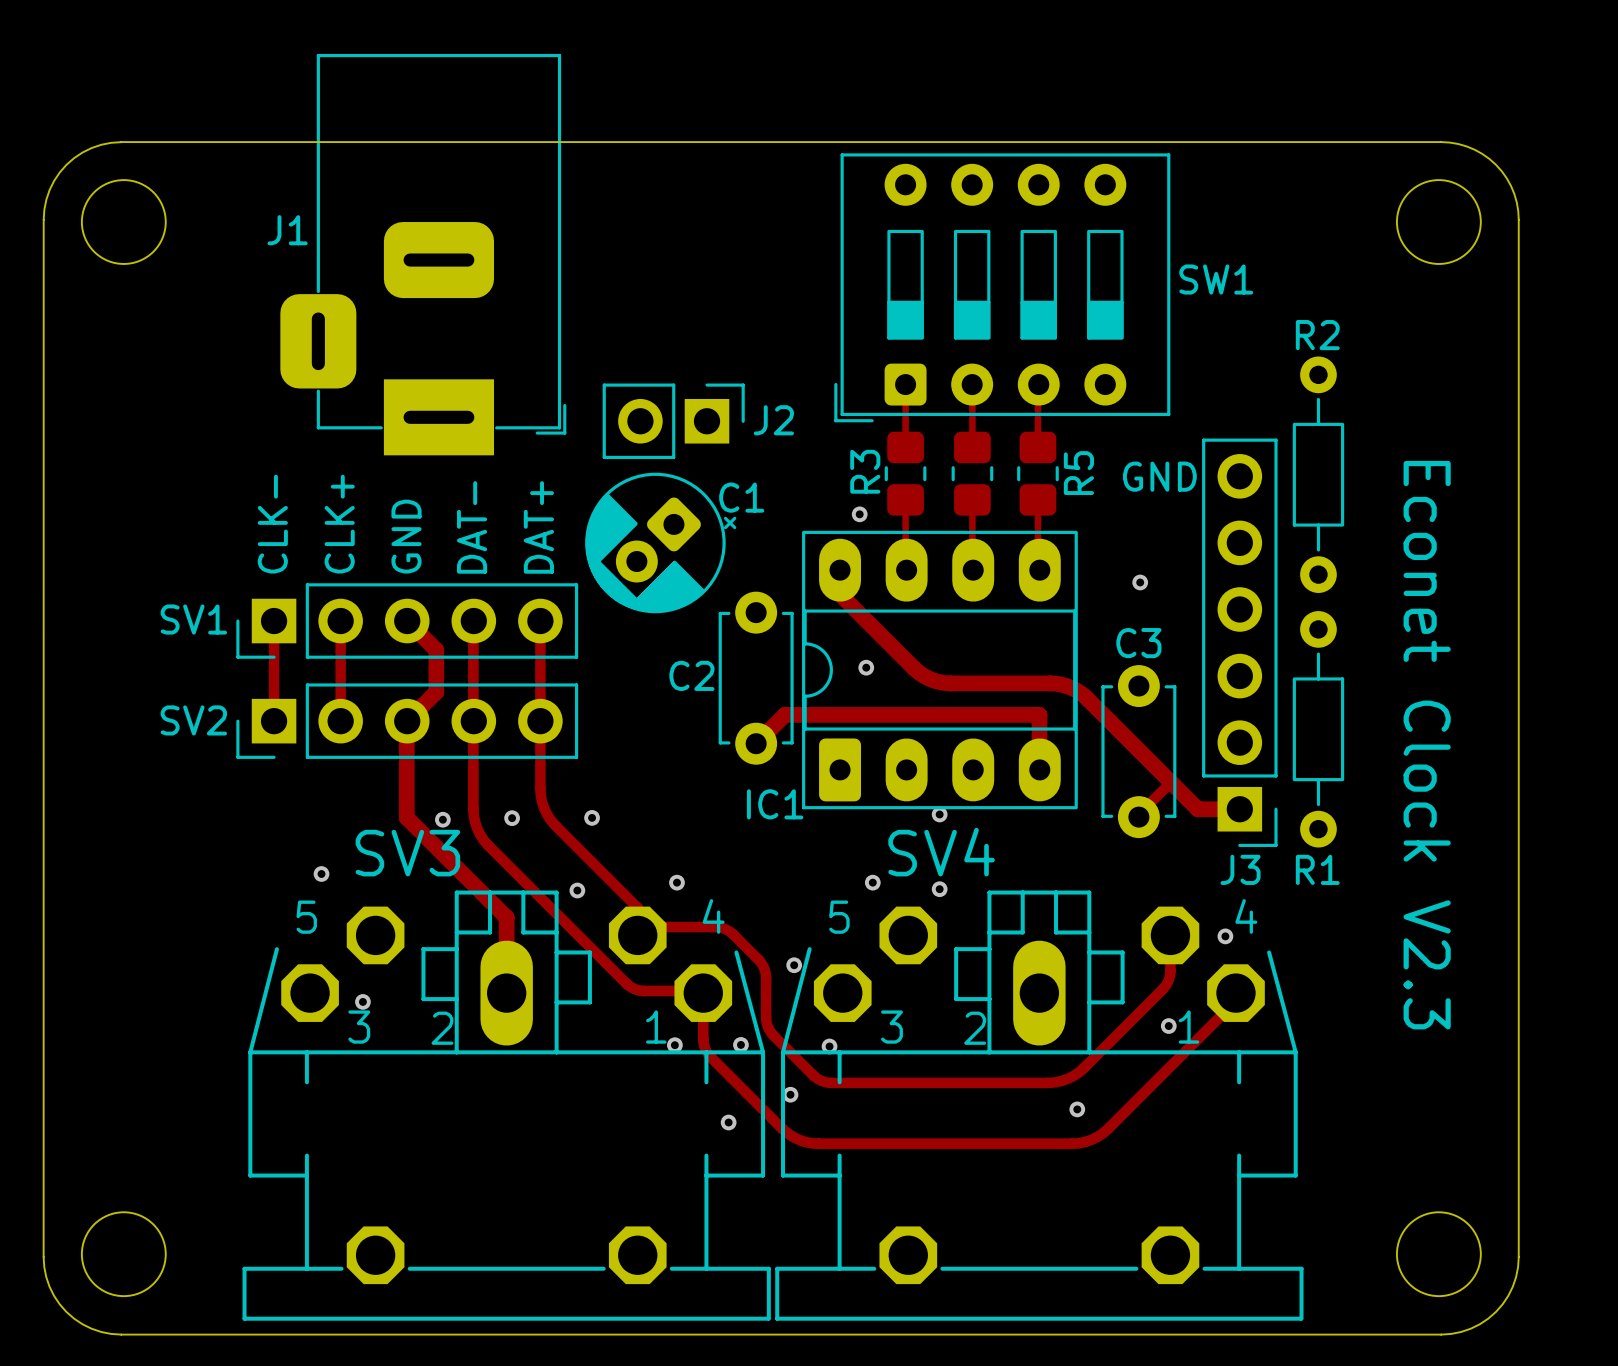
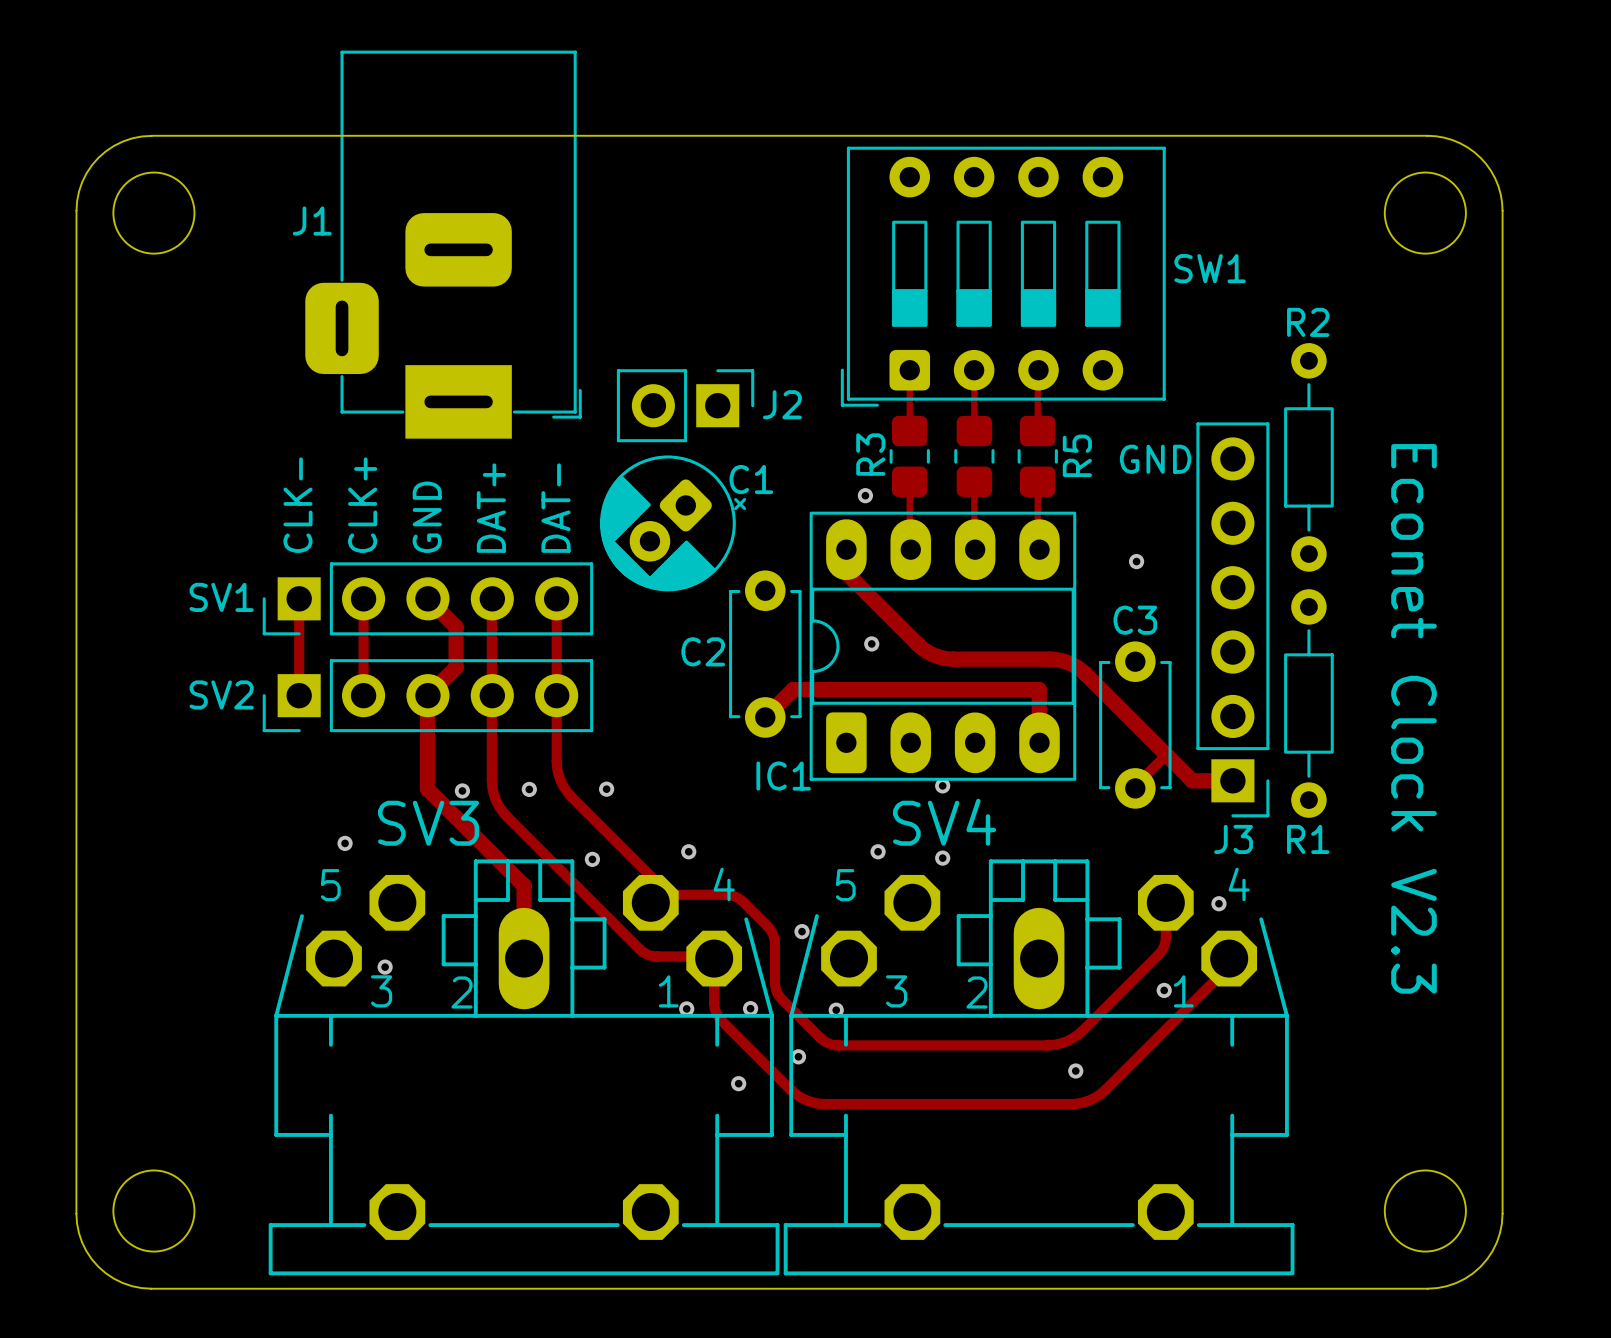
text: DAT- (472, 527) -> DAT+ (491, 508)
text: DAT+ (538, 527) -> DAT- (556, 508)

